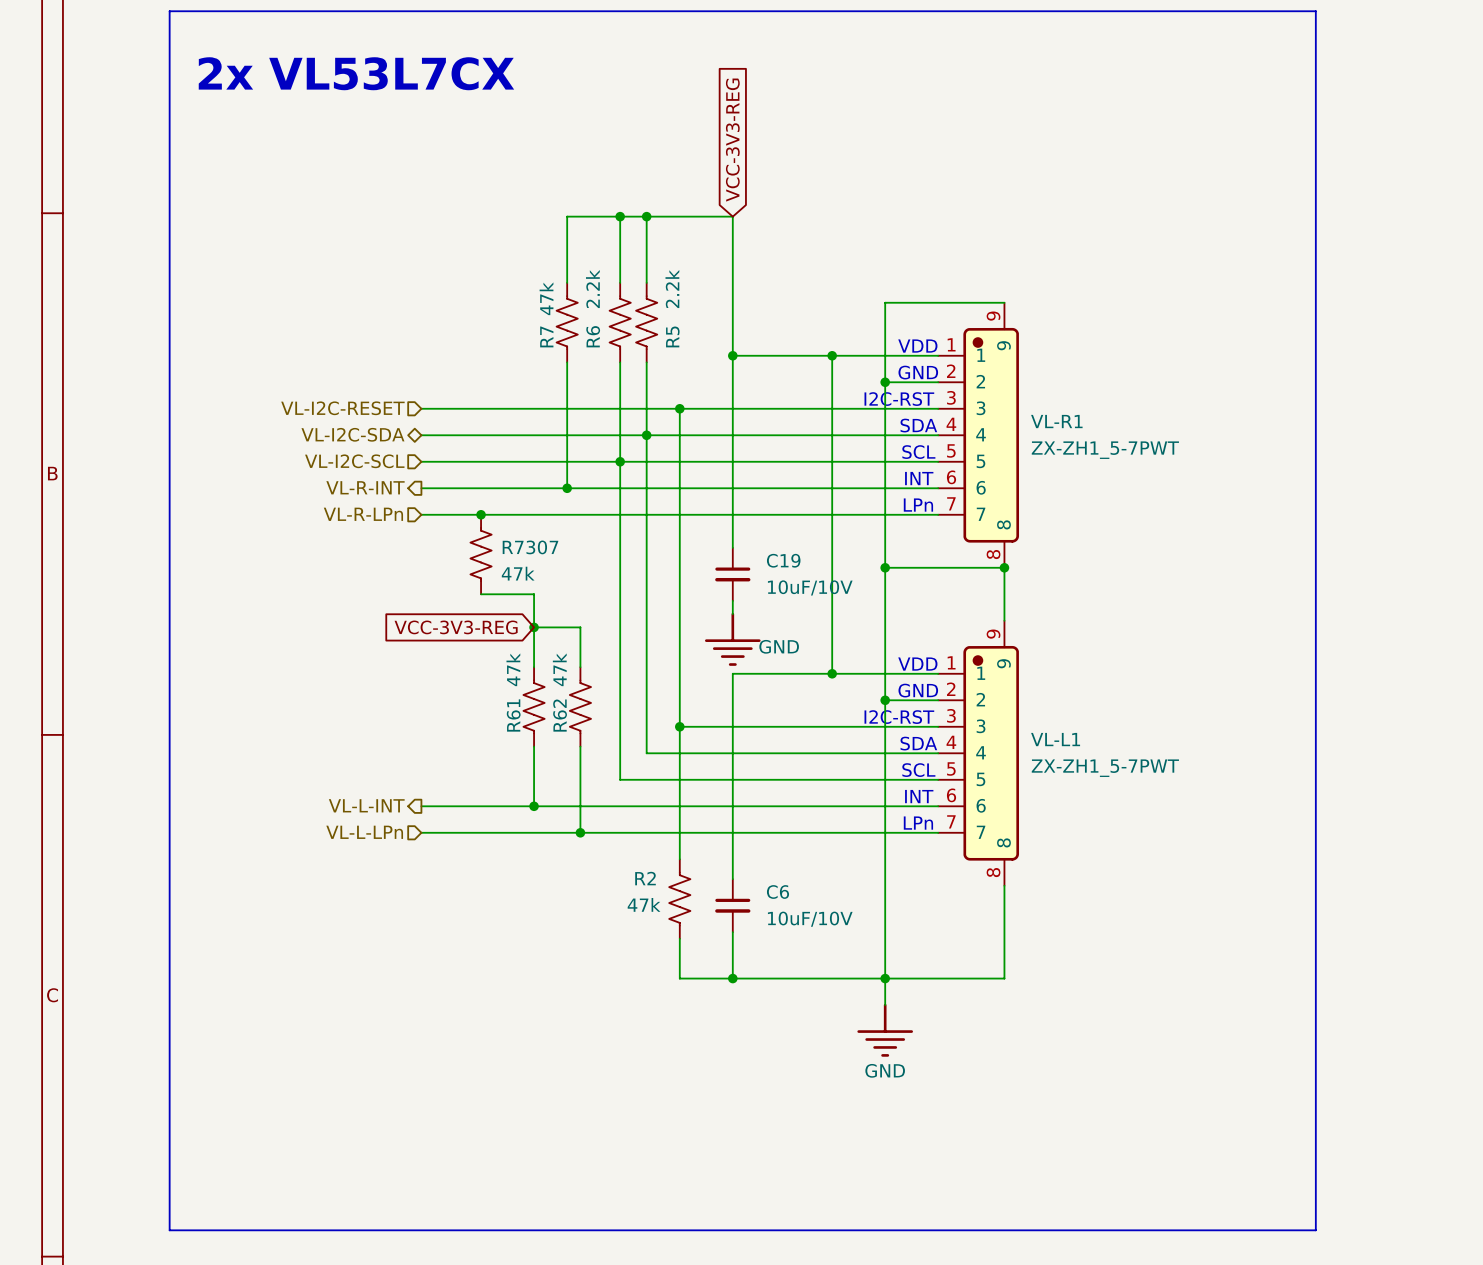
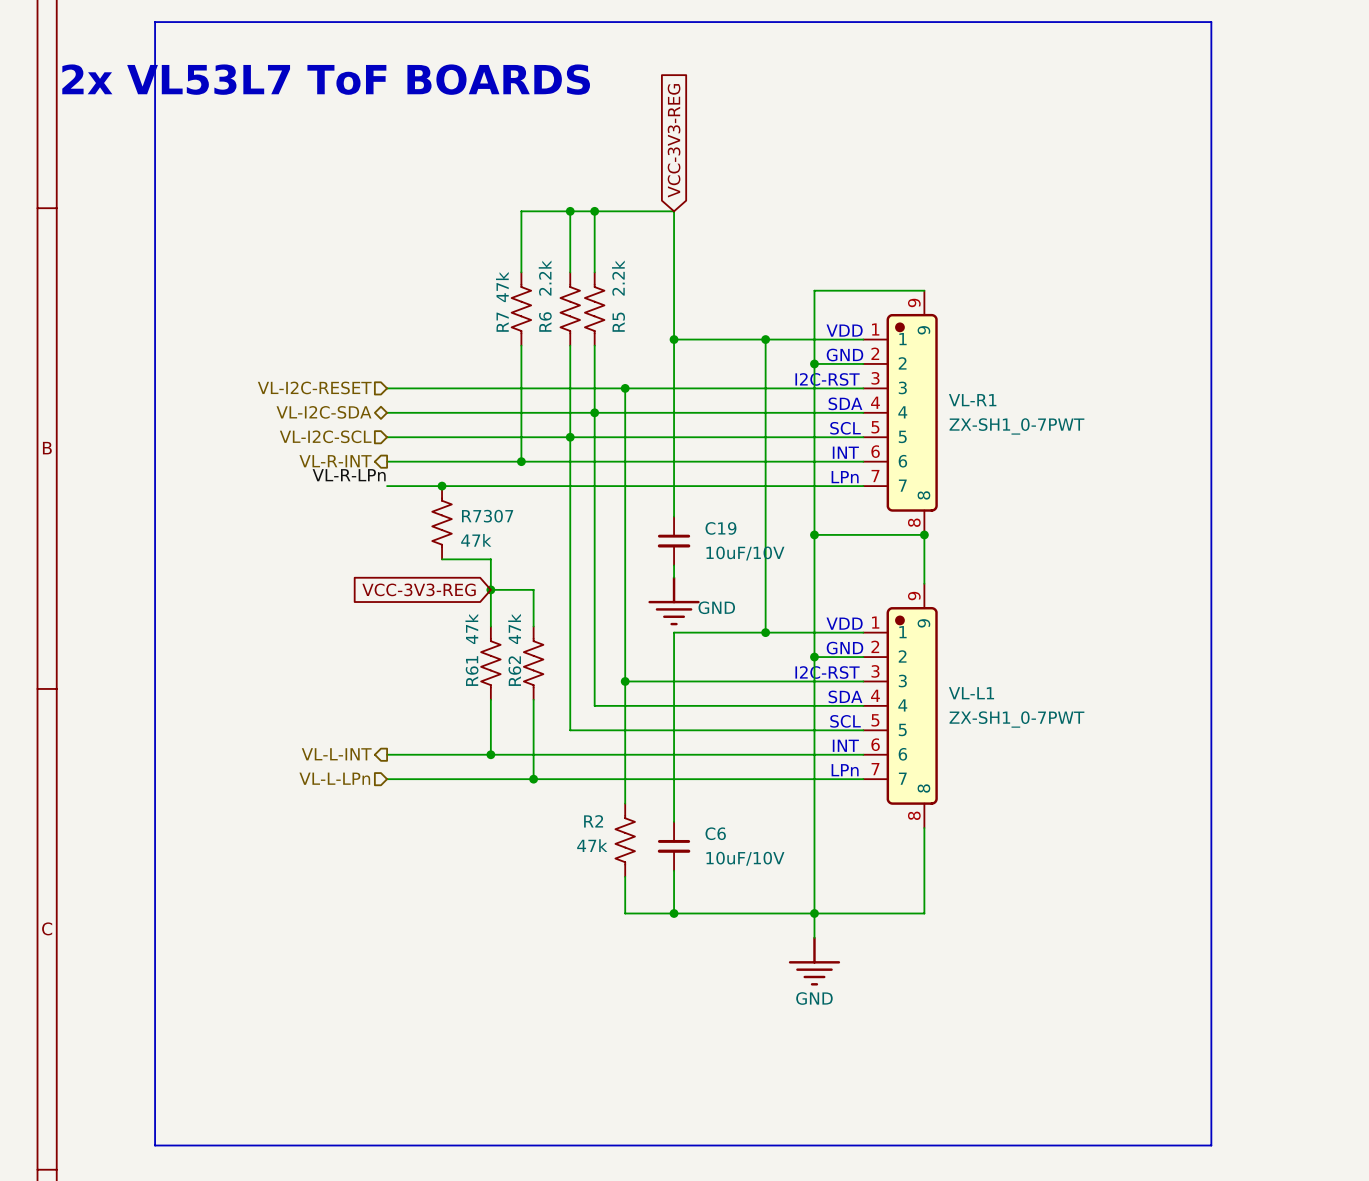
text: 2x VL53L7CX (356, 73) -> 2x VL53L7 ToF BOARDS (326, 79)
VL-R1 value: ZX-ZH1_5-7PWT (1105, 450) -> ZX-SH1_0-7PWT (1016, 426)
label: none -> VL-R-LPn (349, 475)
hierarchical label: VL-R-LPn (363, 514) -> none
VL-L1 value: ZX-ZH1_5-7PWT (1105, 768) -> ZX-SH1_0-7PWT (1016, 719)

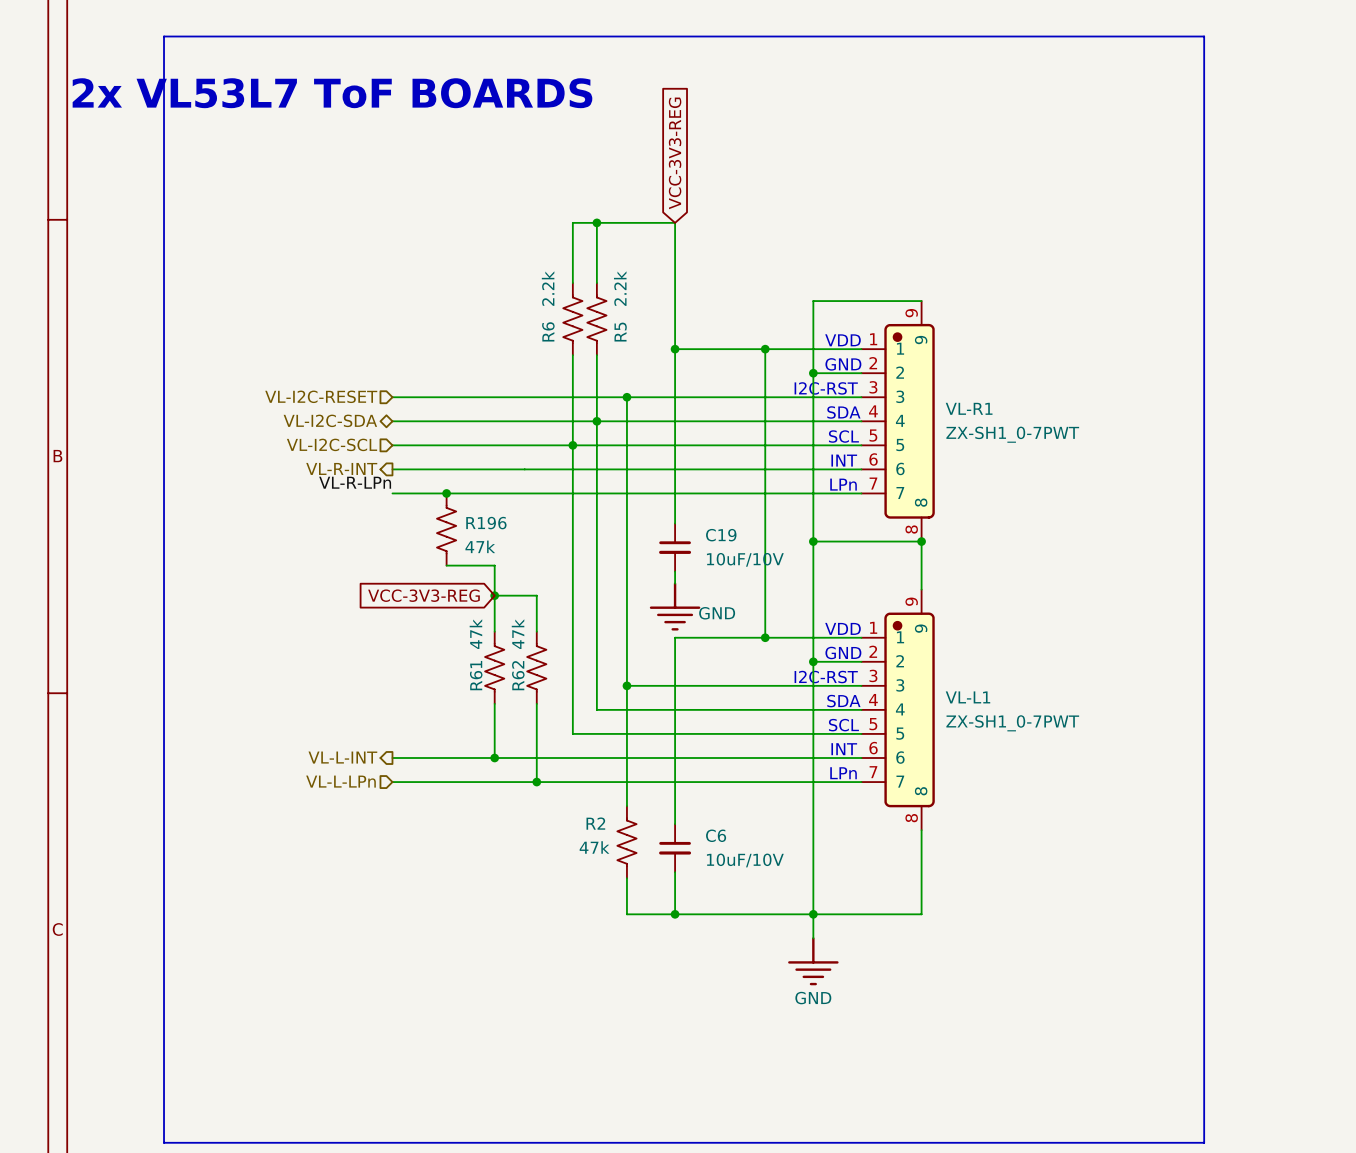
wire: (570, 211) (521, 211) (521, 272) -> none
junction: (570, 211) -> none
R7: 47k (521, 309) -> none
wire: (521, 345) (521, 461) -> none
junction: (521, 461) -> none
R7307 name: R7307 (487, 516) -> R196 (486, 523)

